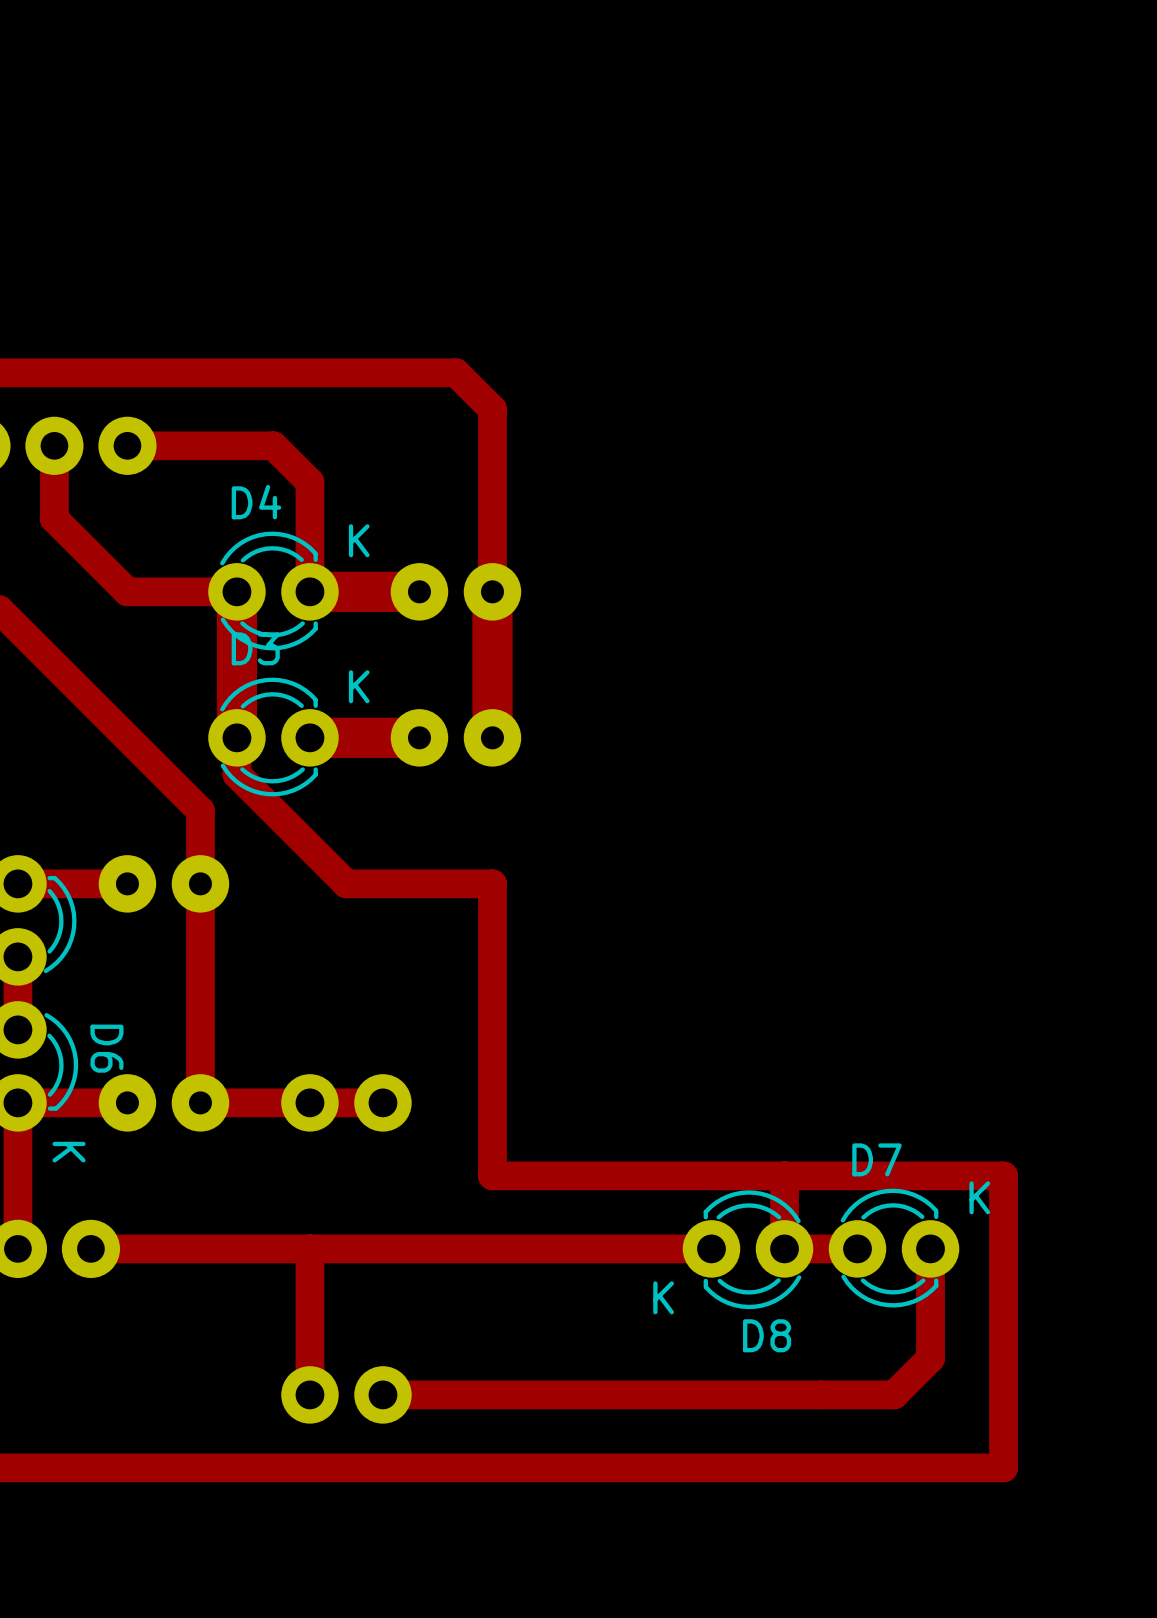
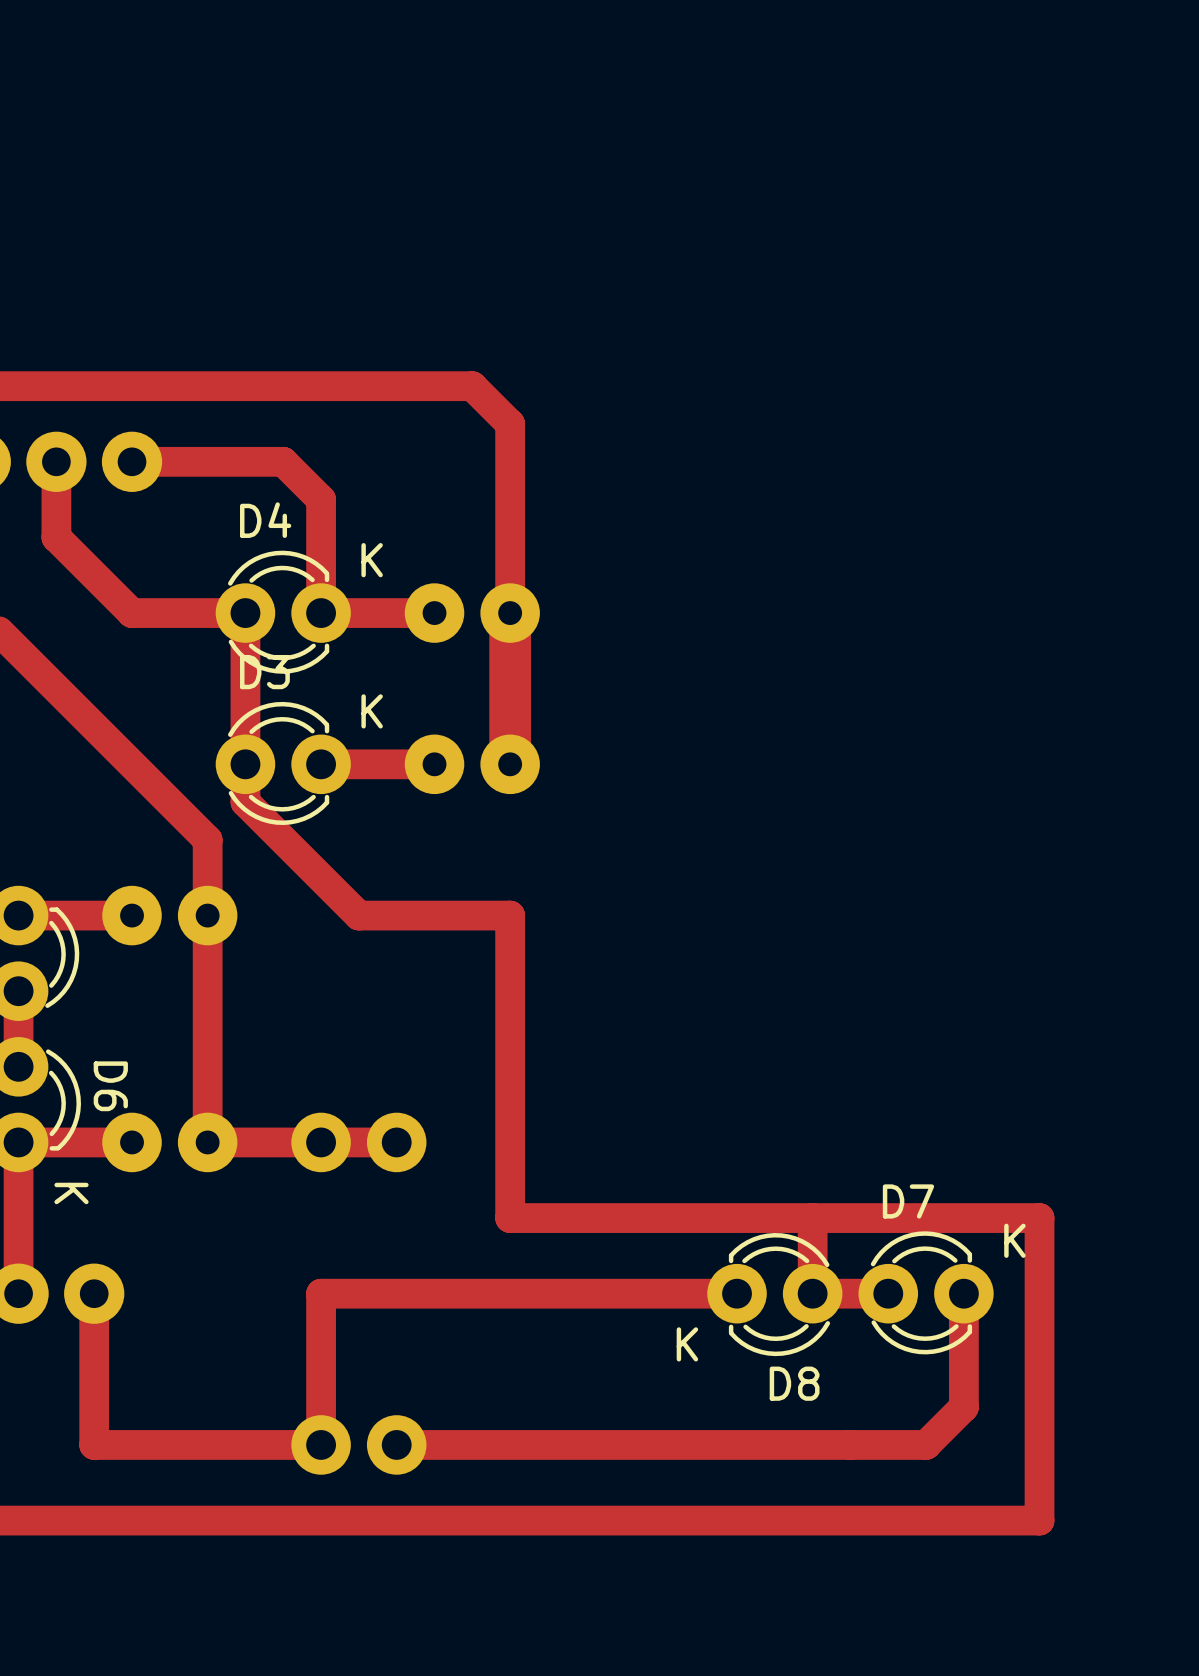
top track width: thick (236, 591) (236, 737) -> thin (245, 613) (245, 764)
top track width: thick (419, 591) (309, 591) -> thin (434, 613) (321, 613)
top track width: thick (419, 737) (309, 737) -> thin (434, 764) (321, 764)
top track: (309, 1248) (90, 1248) -> (321, 1444) (94, 1444) (94, 1293)

